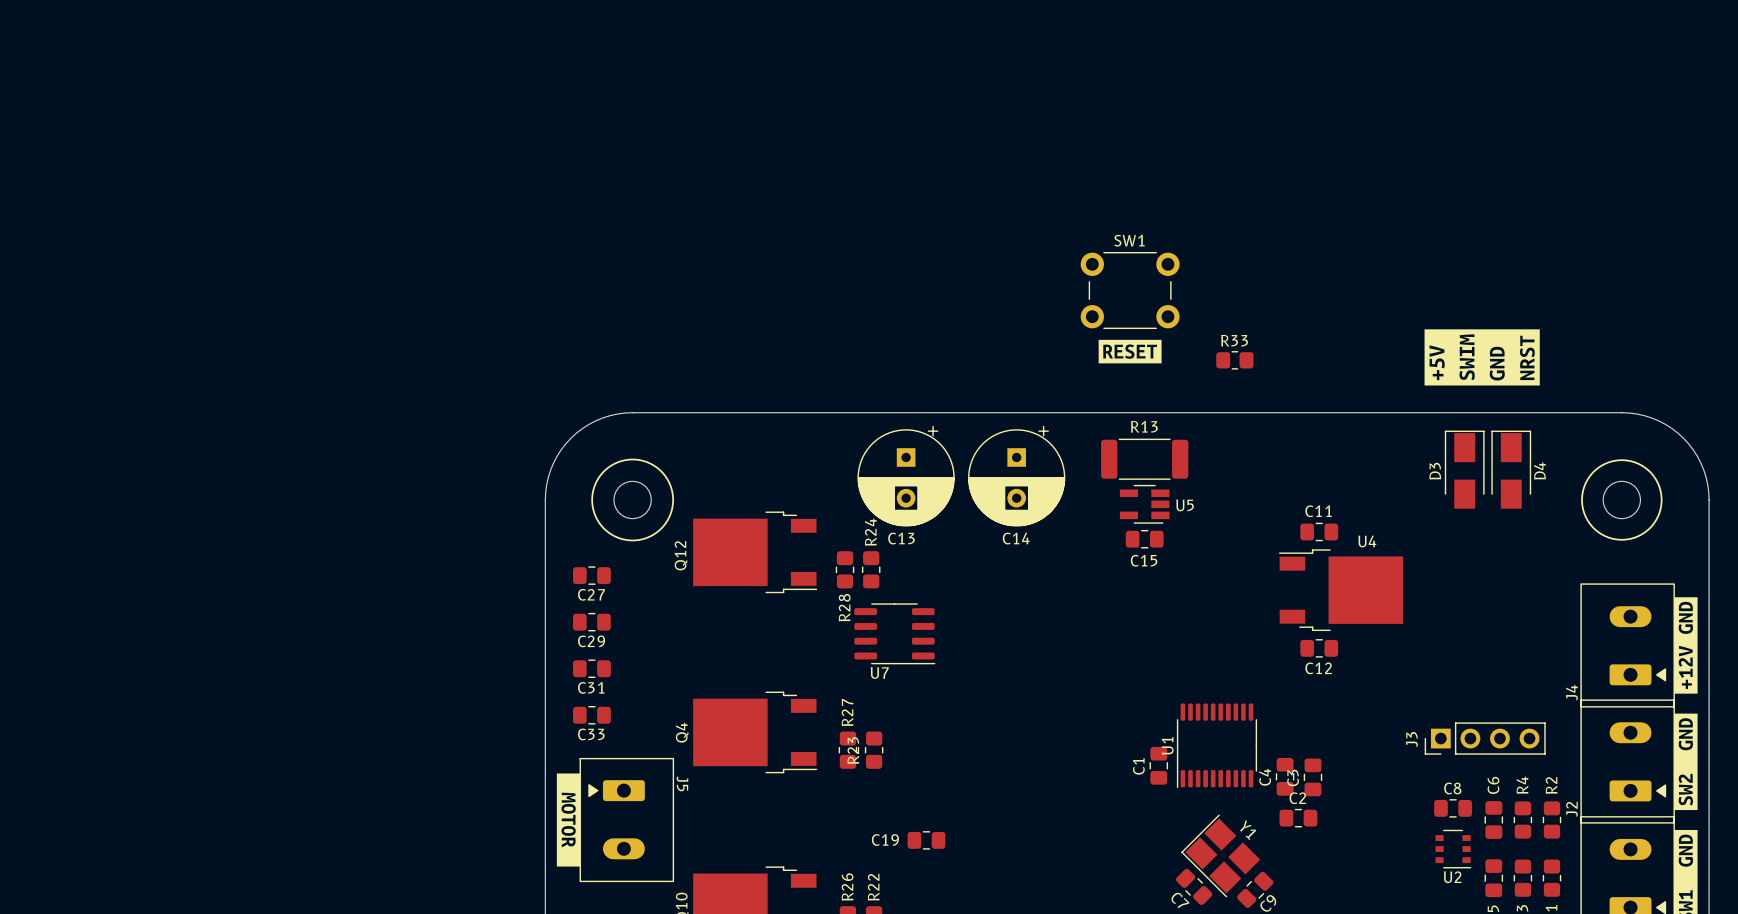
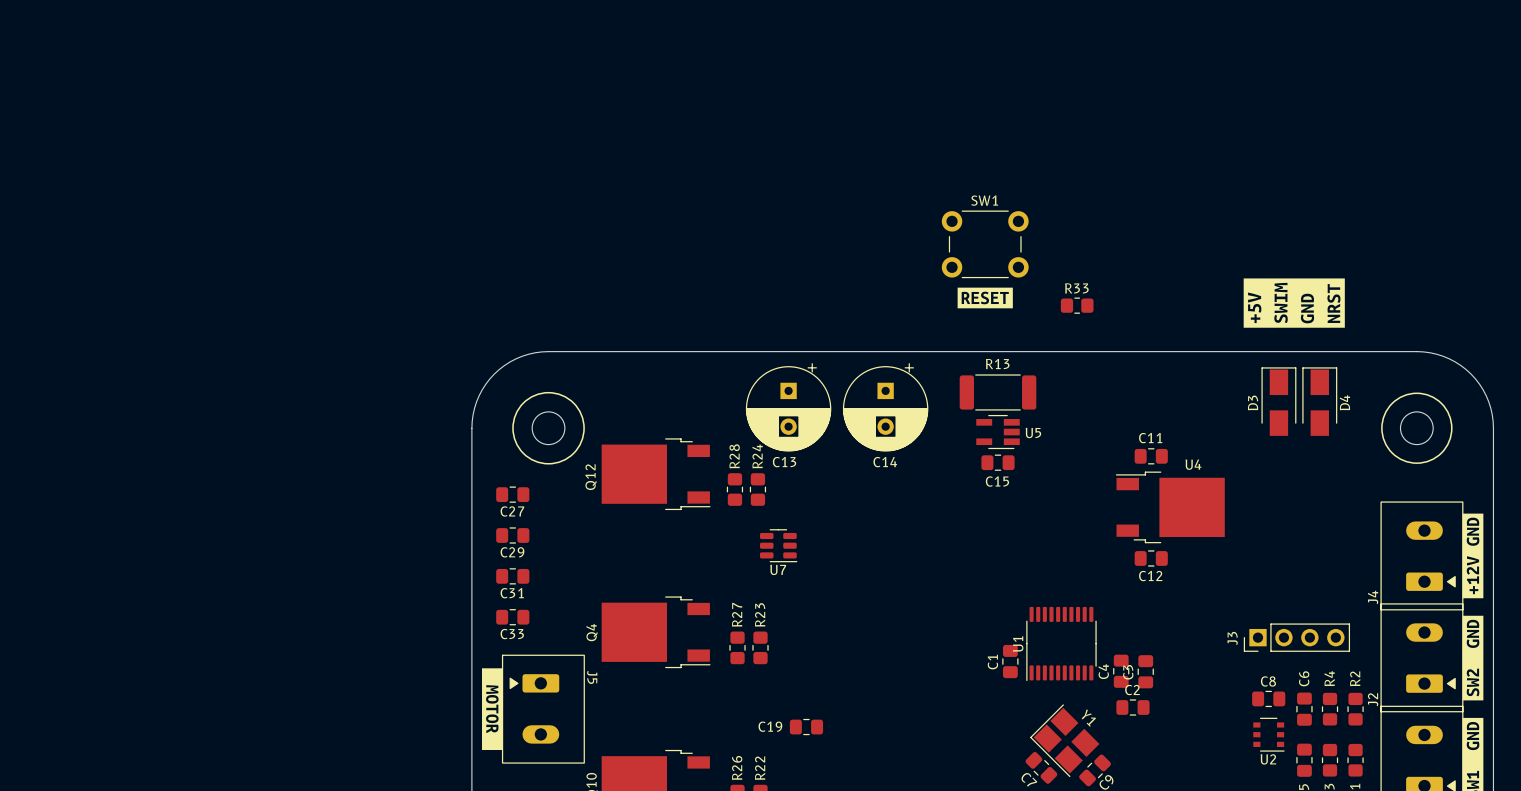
U7 footprint: [854, 603, 936, 665] -> [759, 529, 798, 563]
R28 name position: R28 (844, 607) -> R28 (734, 456)
R23 name position: R23 (853, 750) -> R23 (760, 614)

